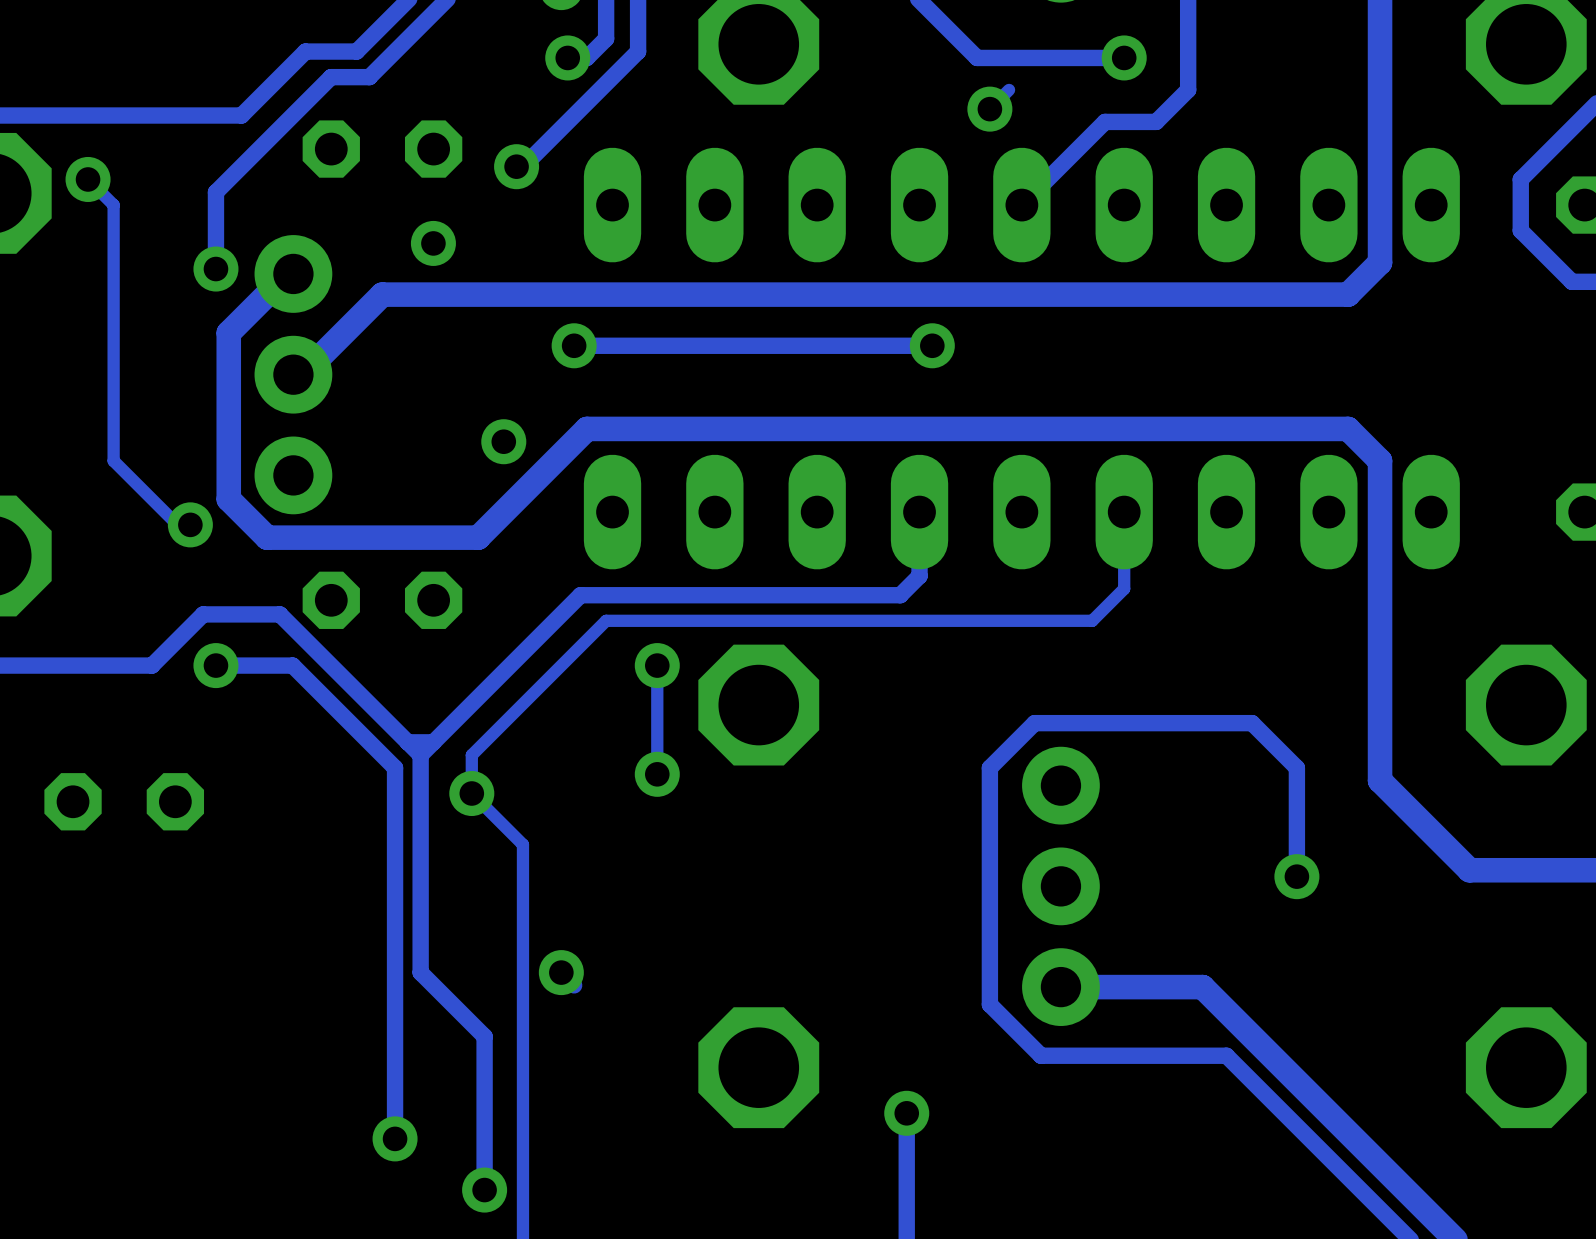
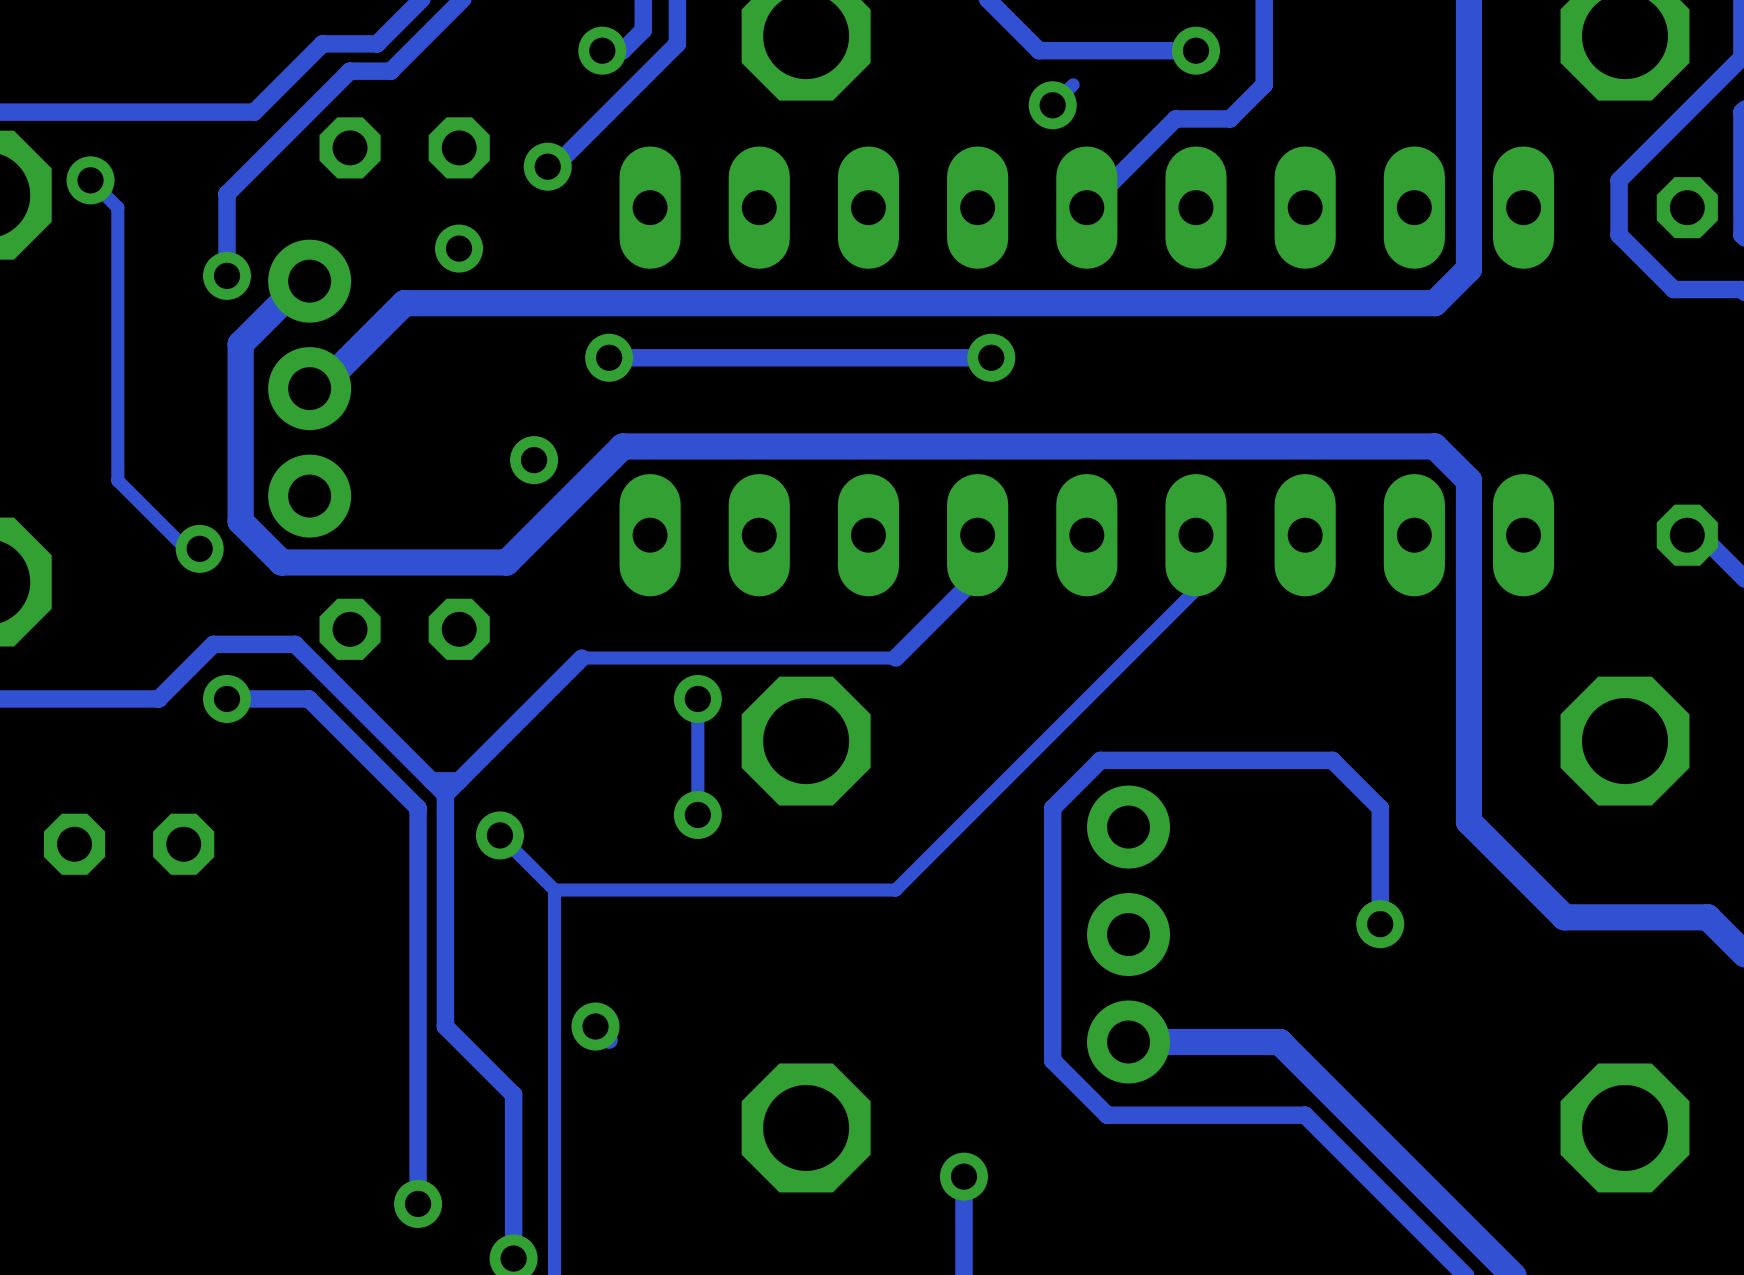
track: (919, 550) (919, 576) (900, 595) (580, 595) (548, 627) -> (977, 576) (895, 658) (581, 658)
track: (1124, 563) (1124, 588) (1092, 620) (606, 620) (471, 755) (471, 793) -> (1195, 589) (895, 890) (554, 890)

